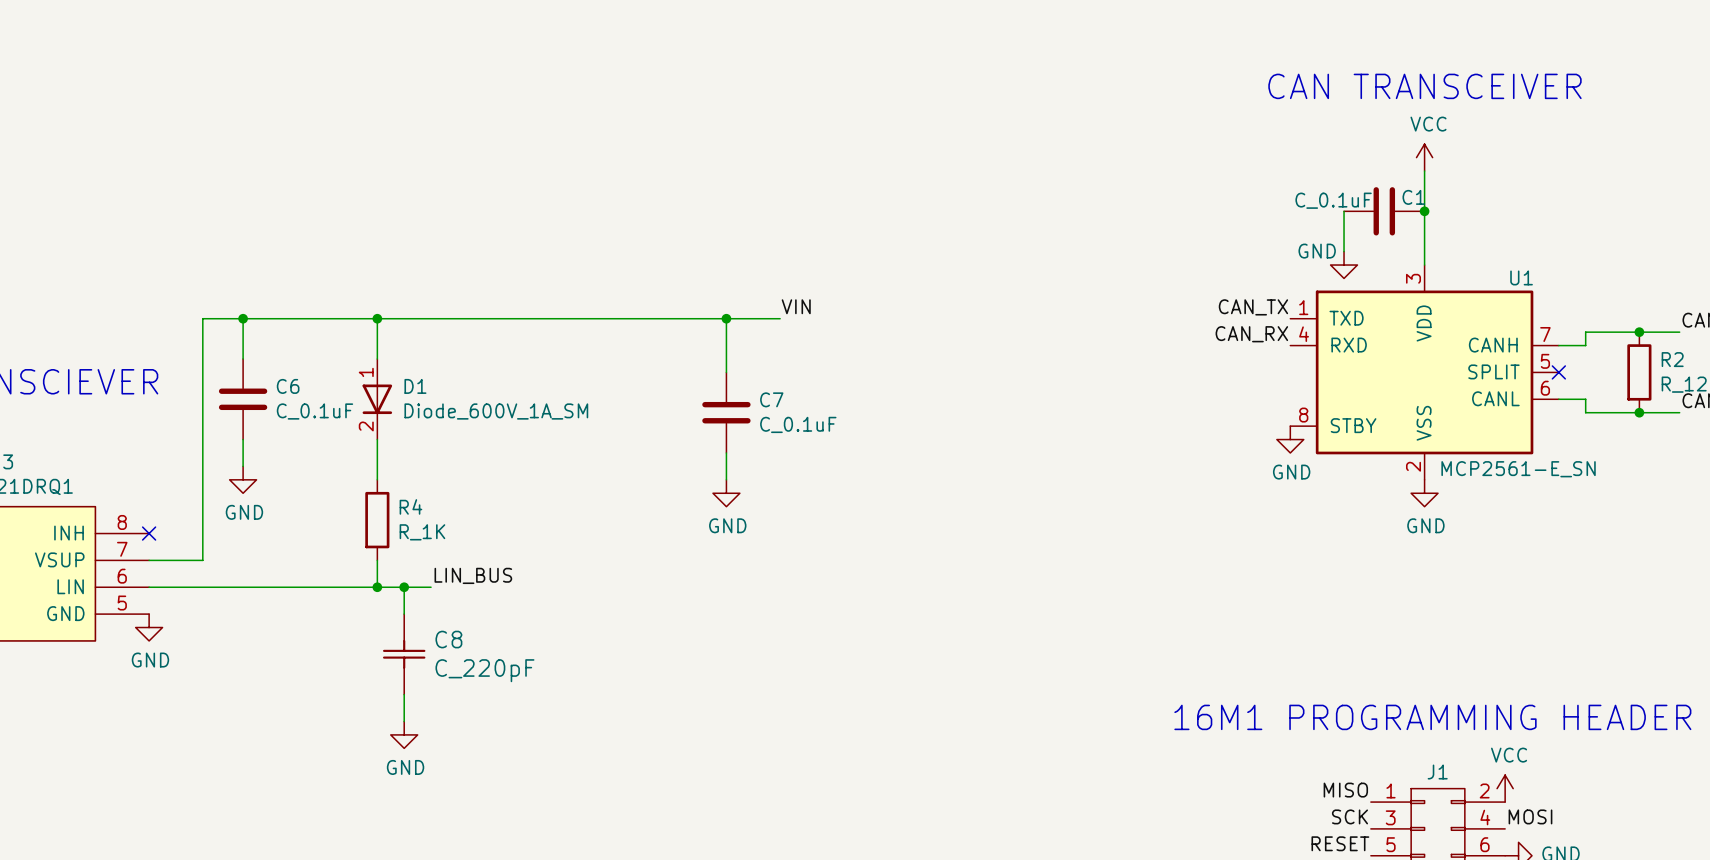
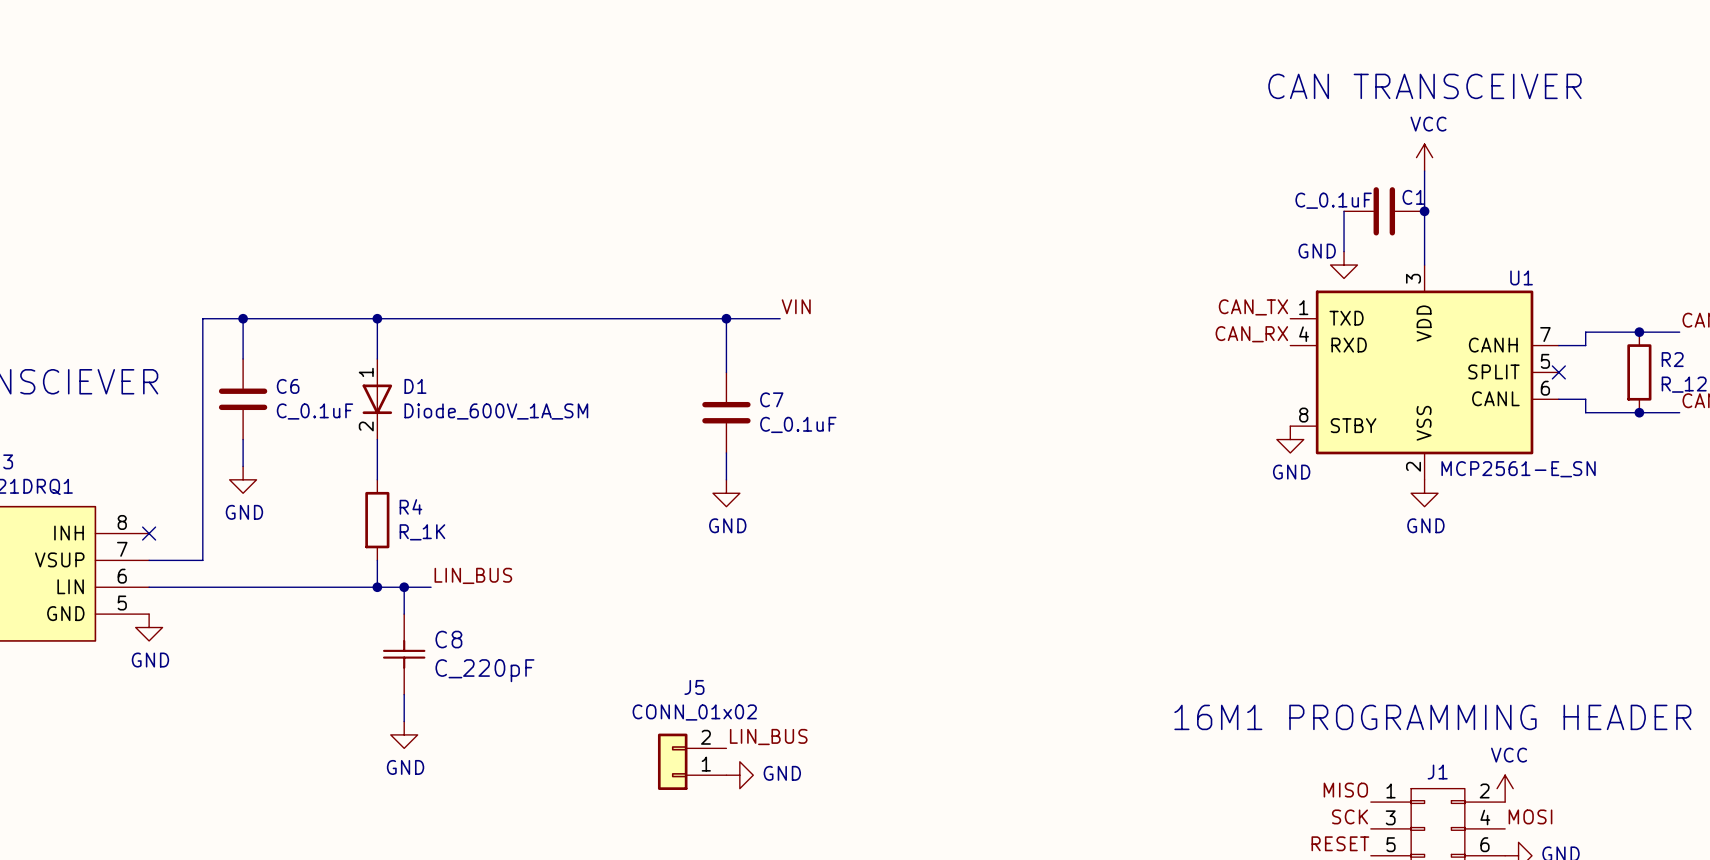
label: none -> LIN_BUS (768, 737)
J5: none -> CONN_01x02 (692, 761)
power symbol: none -> GND (739, 775)

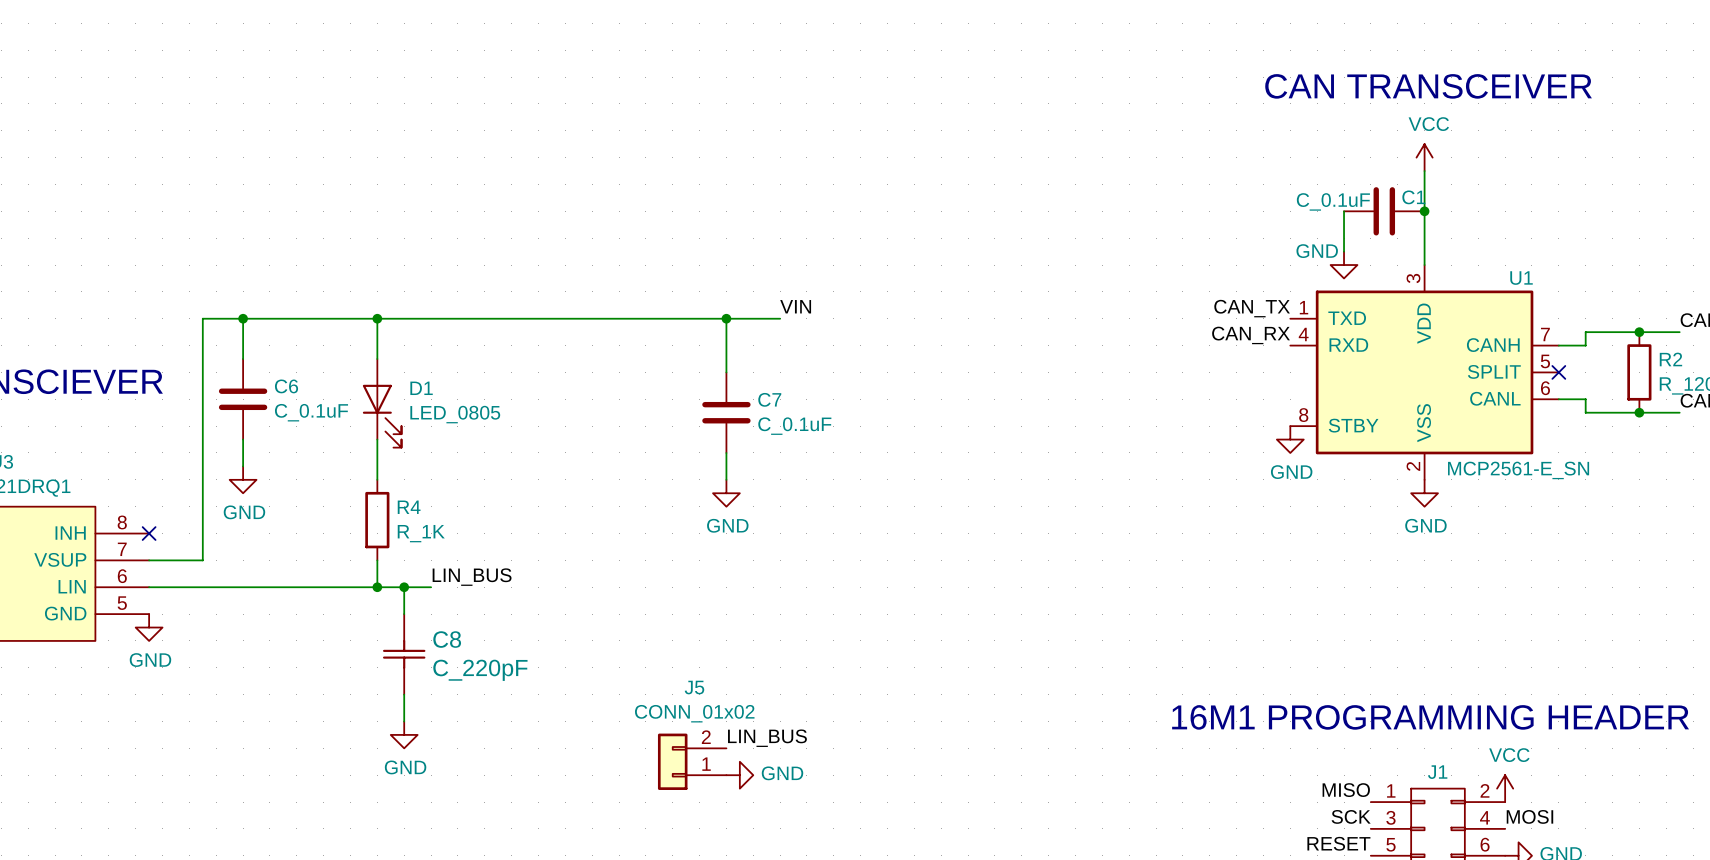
D1 symbol: [362, 359, 393, 440] -> [362, 359, 402, 448]
D1 value: Diode_600V_1A_SM (496, 411) -> LED_0805 (455, 414)

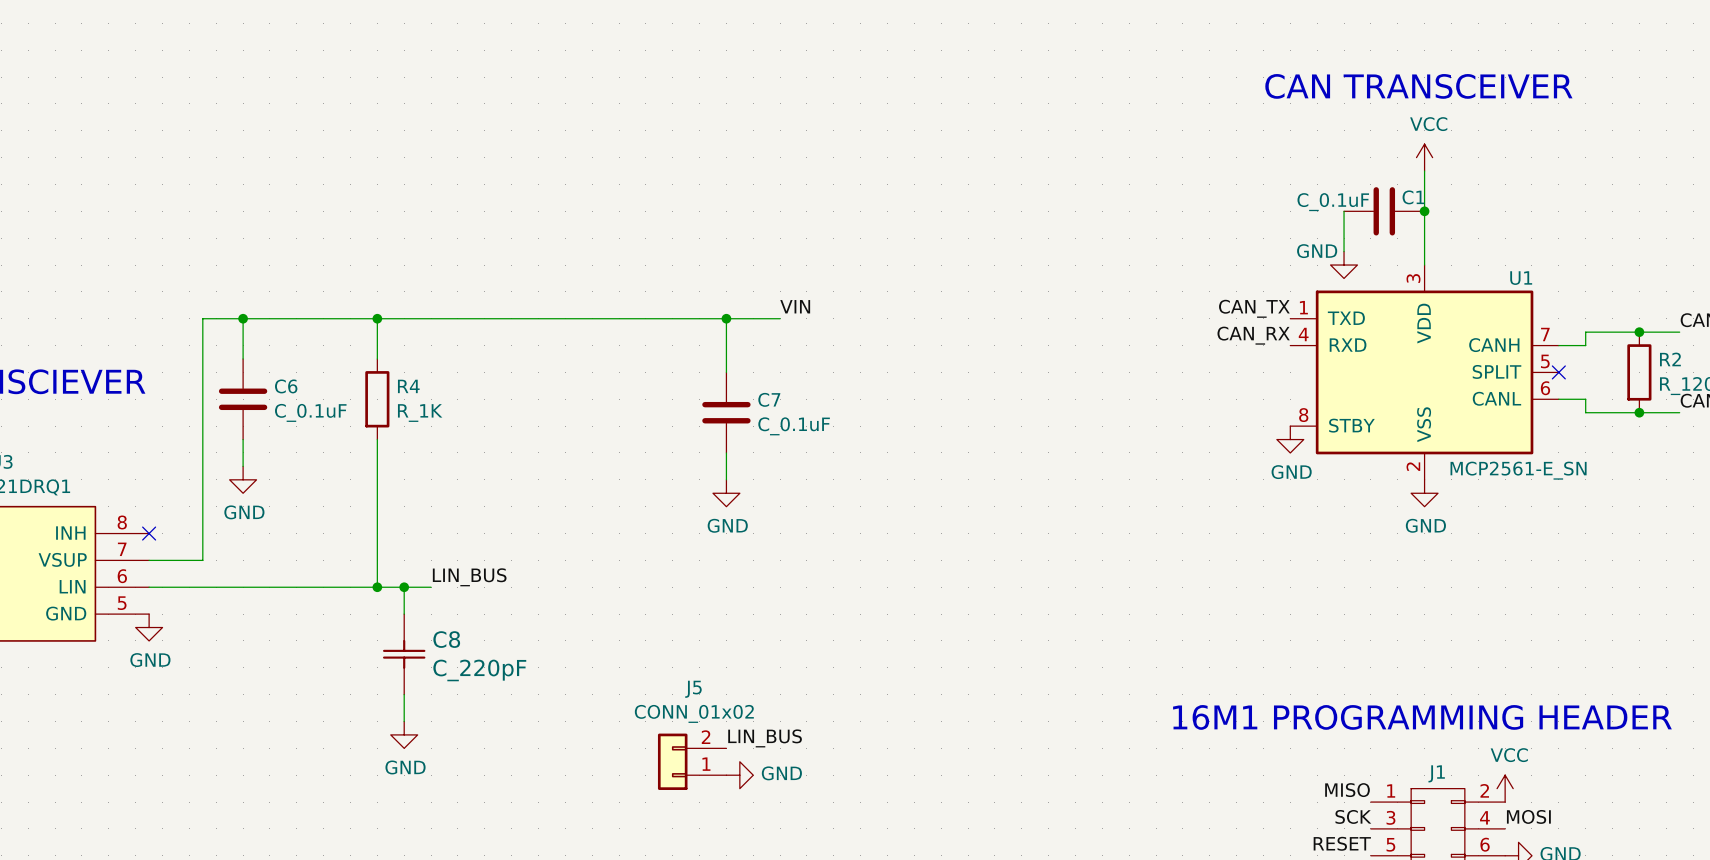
D1: LED_0805 (382, 403) -> none
wire: none -> (377, 479) (377, 560)
R4 position: (377, 520) -> (377, 399)

